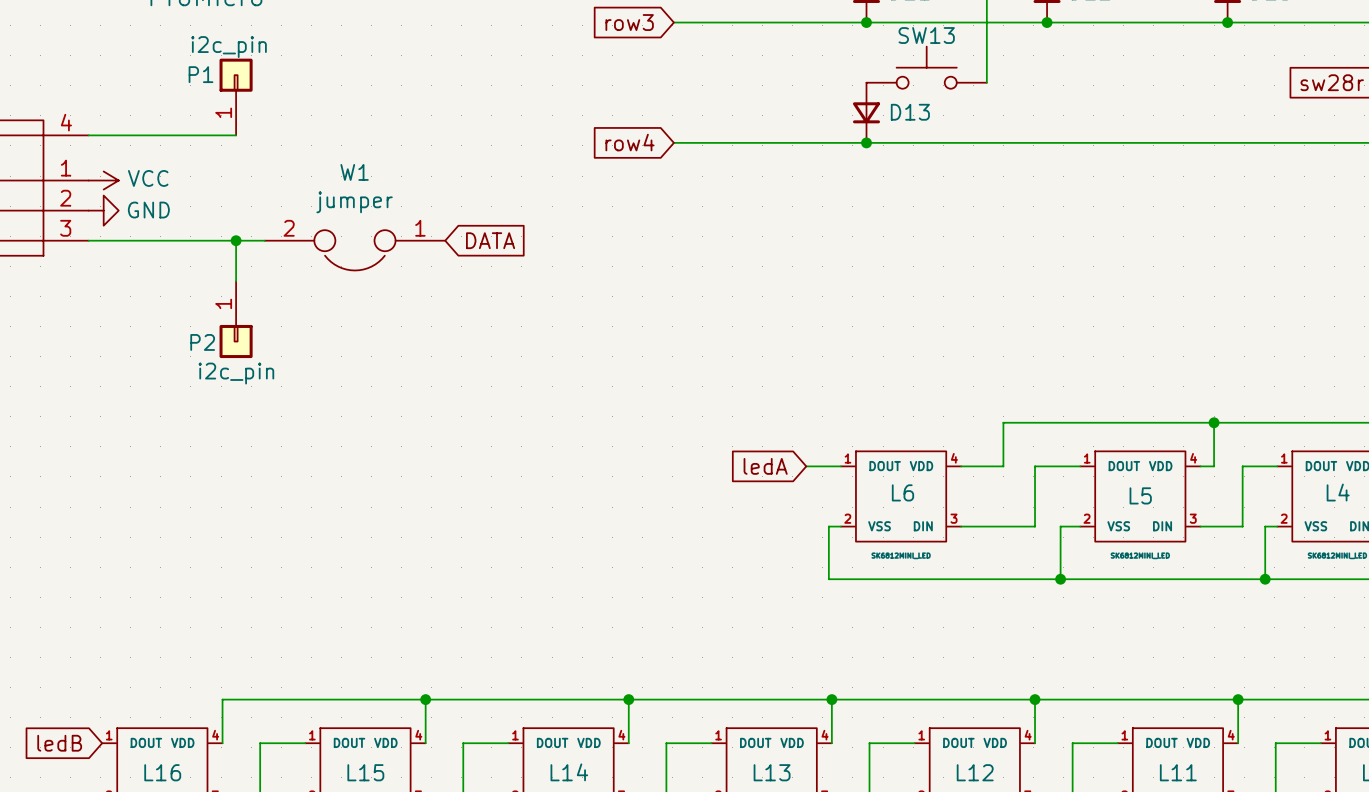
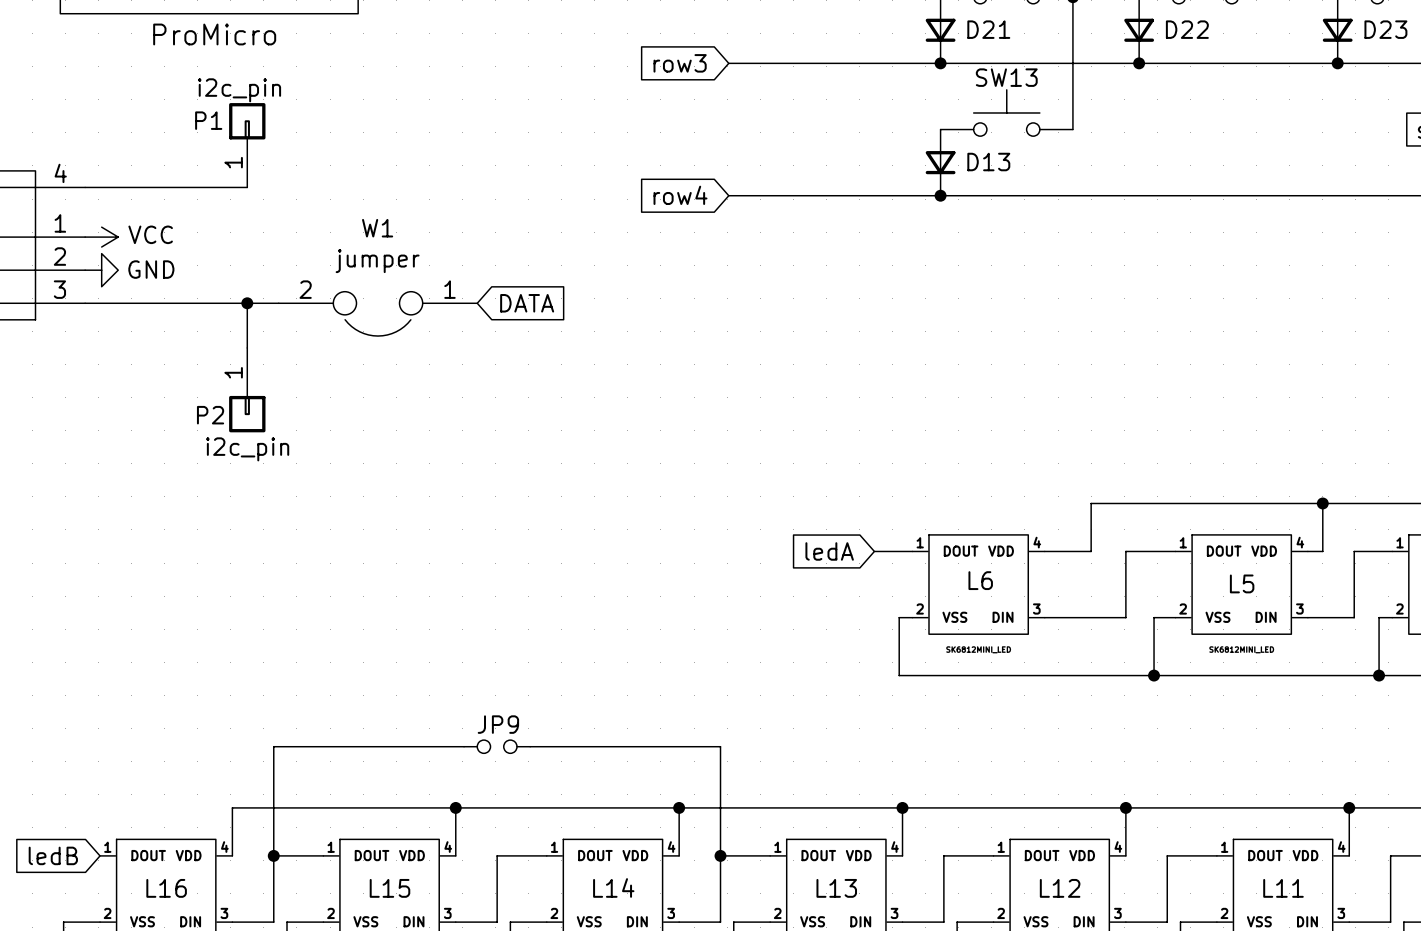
wire: none -> (464, 746) (273, 746) (273, 855)
JP9: none -> (497, 746)
wire: none -> (530, 746) (720, 746) (720, 855)
junction: none -> (273, 855)
junction: none -> (720, 855)

